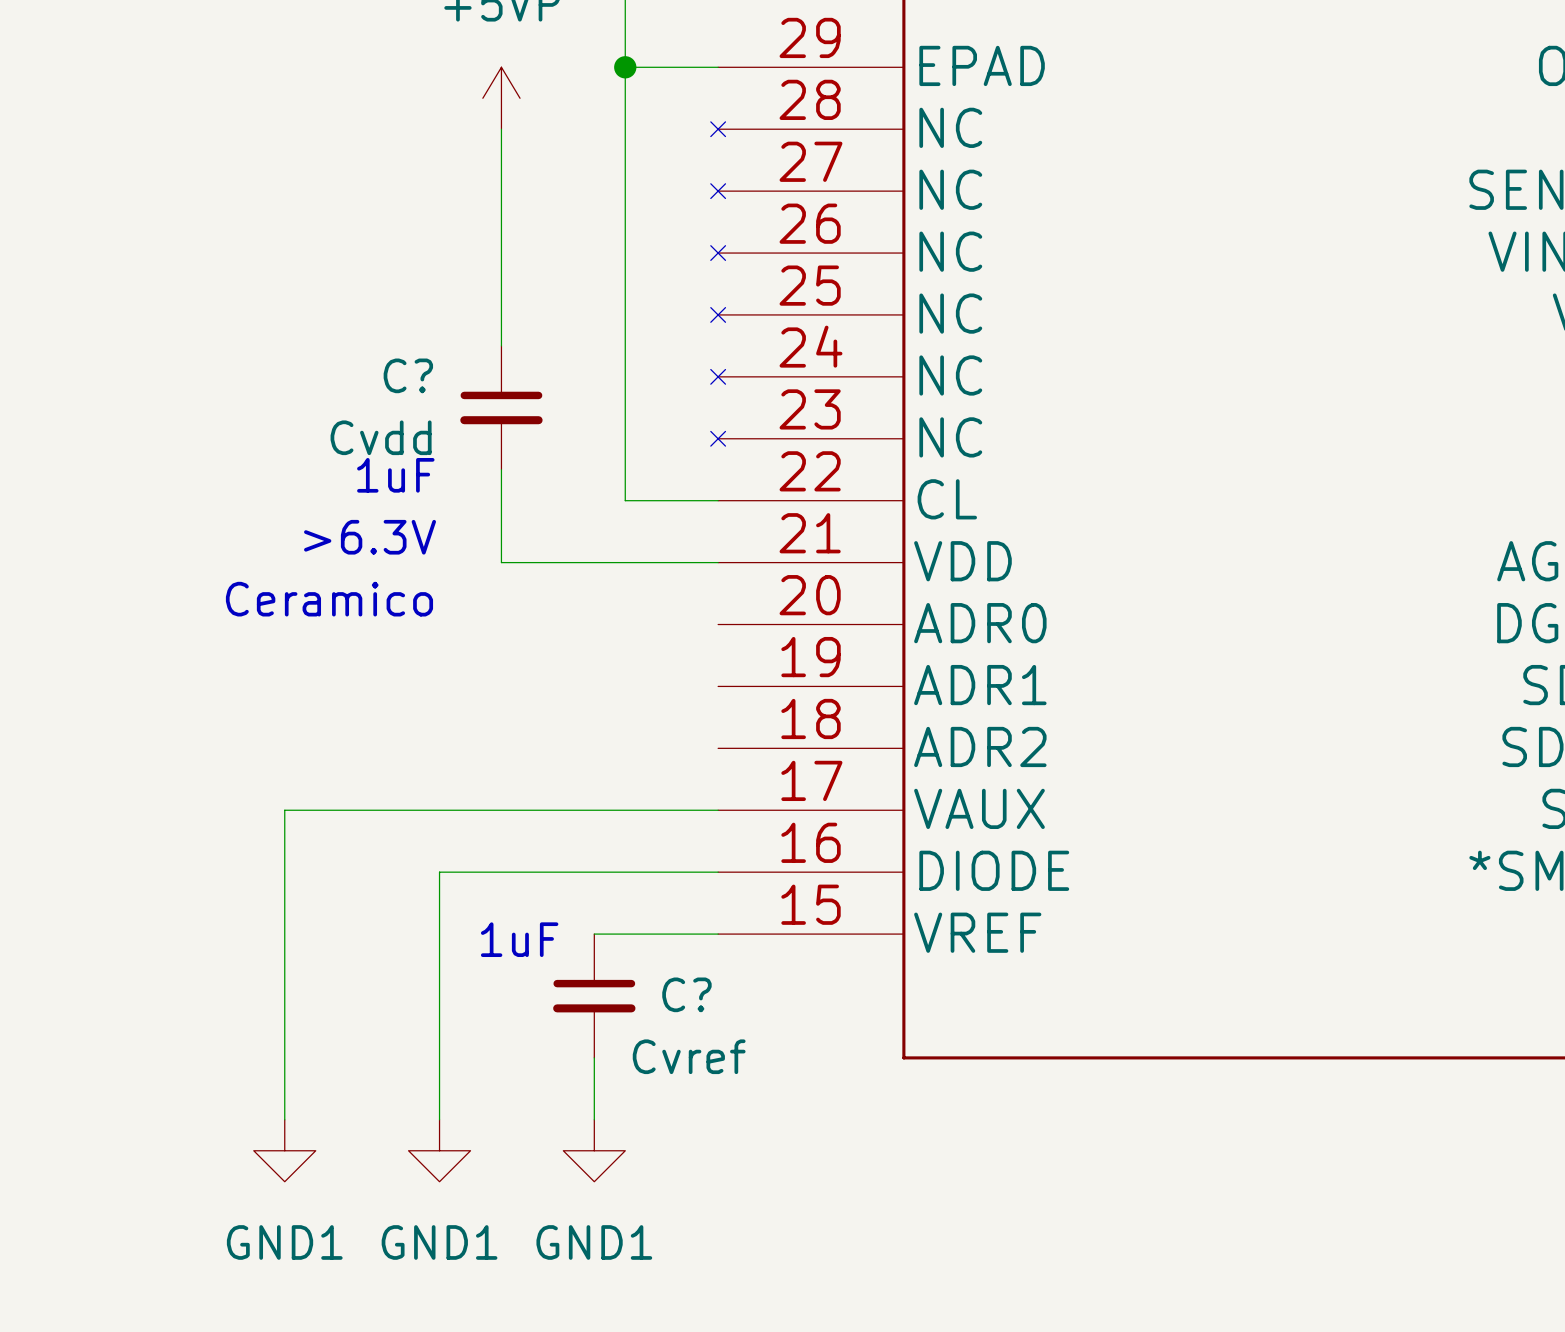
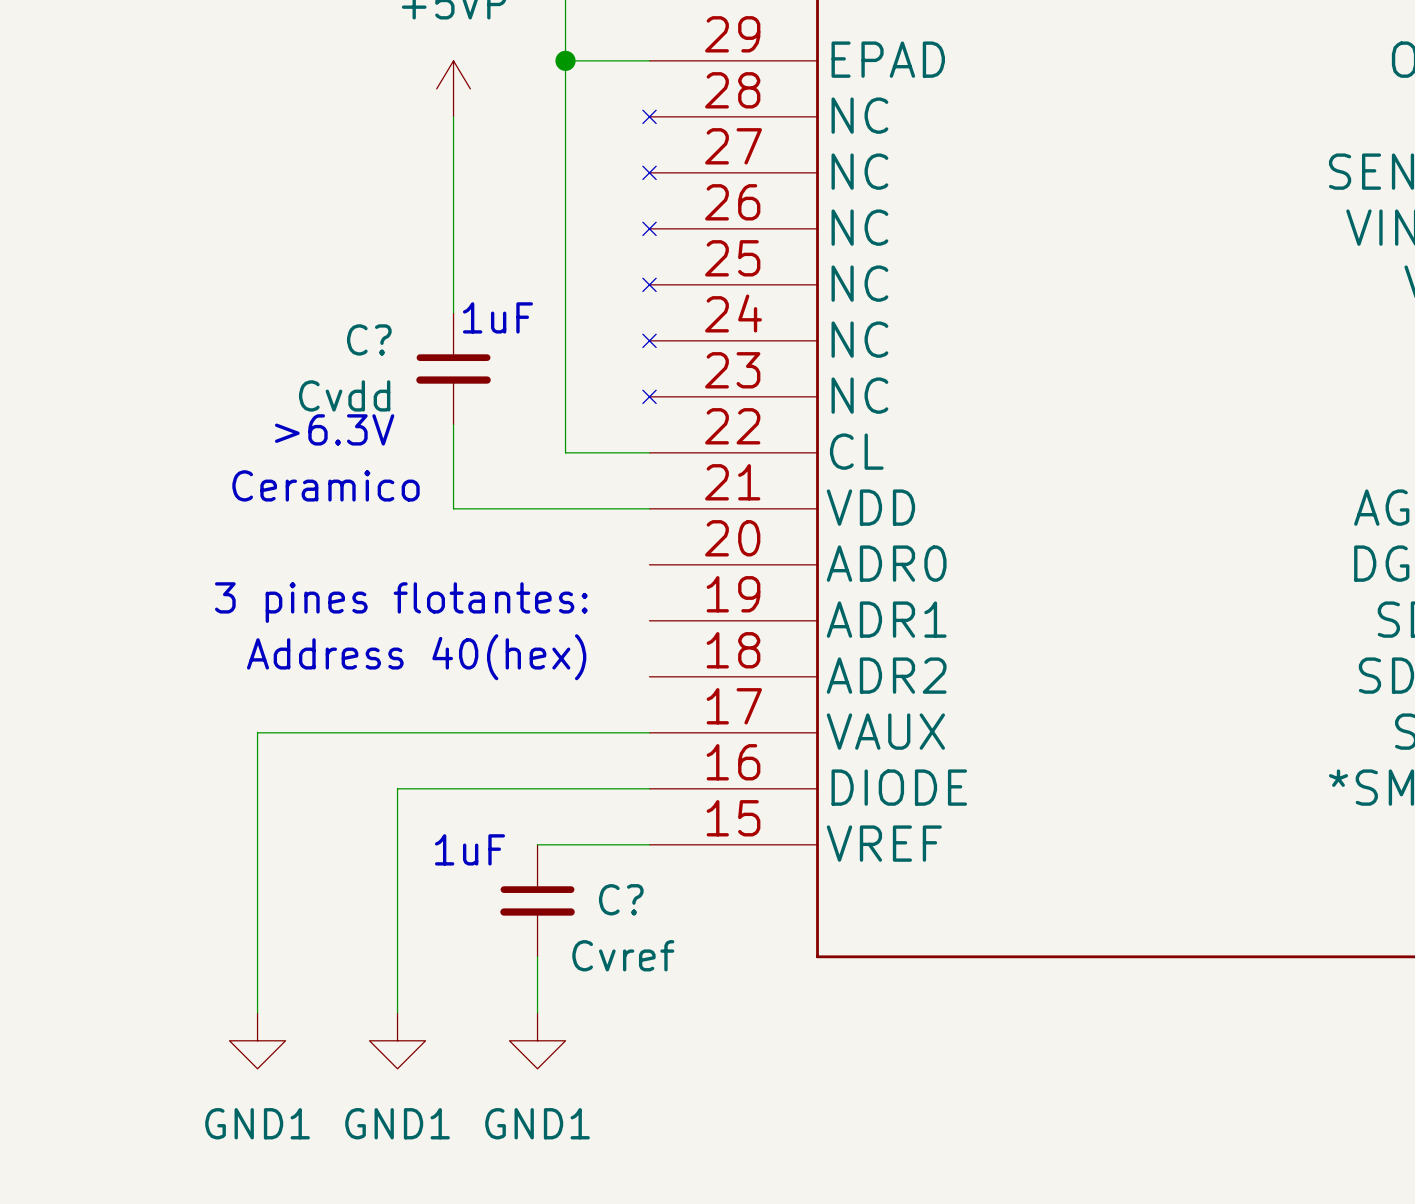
text: none -> 1uF (497, 317)
text: 1uF (395, 475) -> >6.3V (334, 429)
text: >6.3V (370, 537) -> none
text position: Ceramico (329, 599) -> Ceramico (325, 485)
text: none -> 3 pines flotantes: (401, 602)
text: none -> Address 40(hex) (416, 657)

